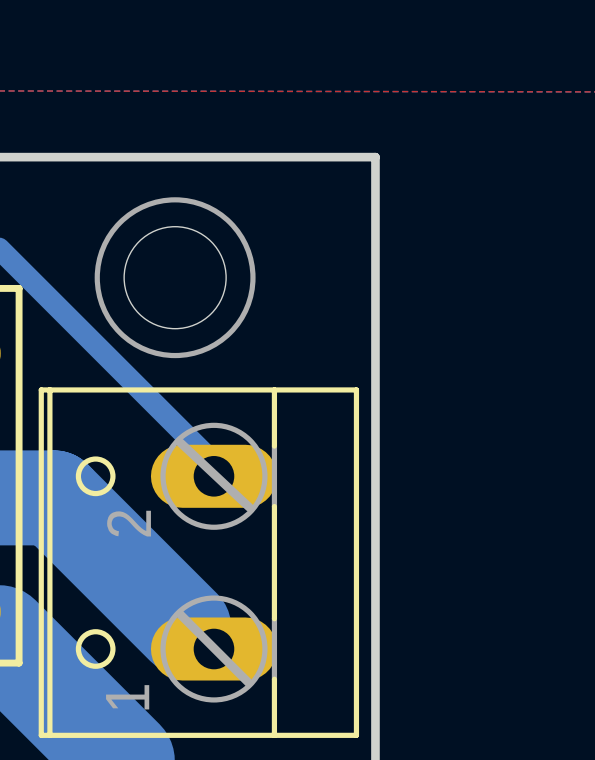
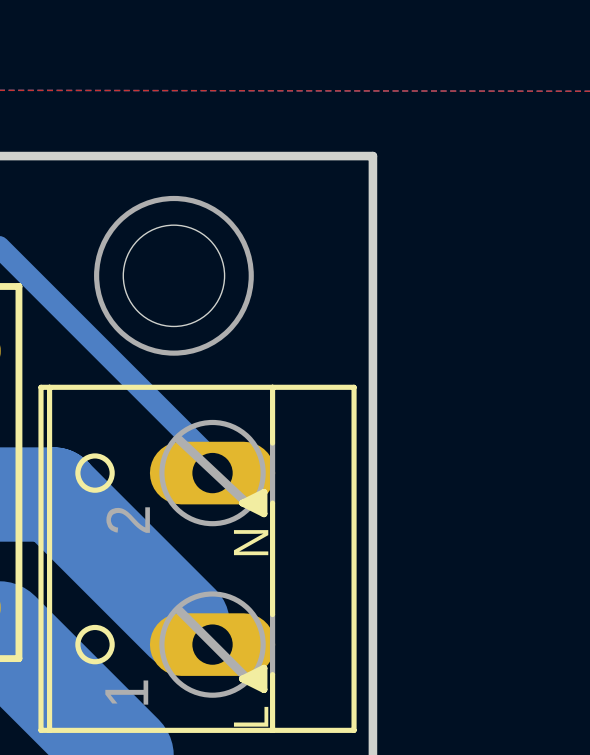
drawing: none -> [239, 488, 268, 518]
text: none -> N (251, 542)
drawing: none -> [239, 664, 268, 694]
text: none -> L (251, 716)

